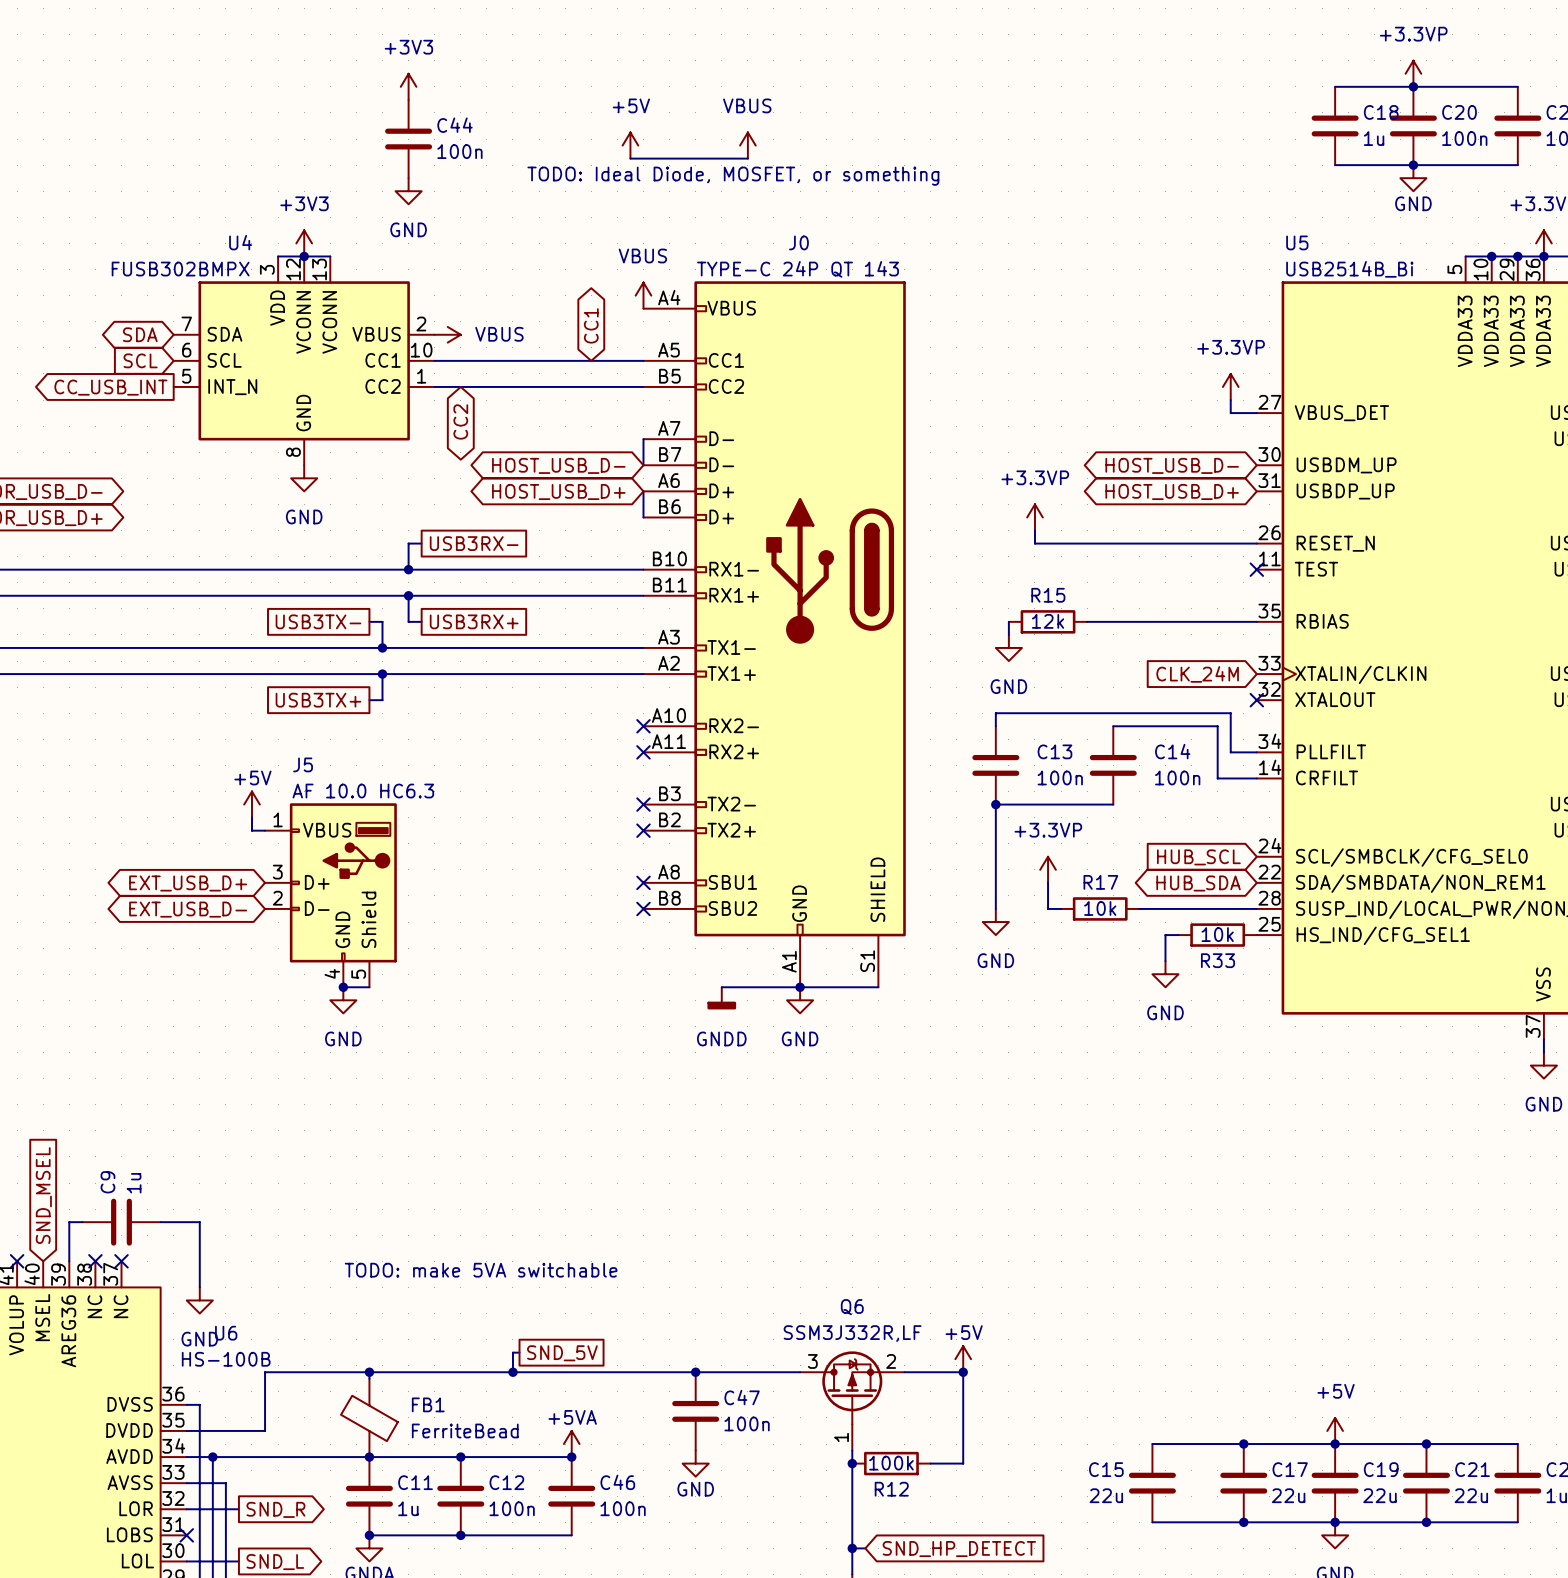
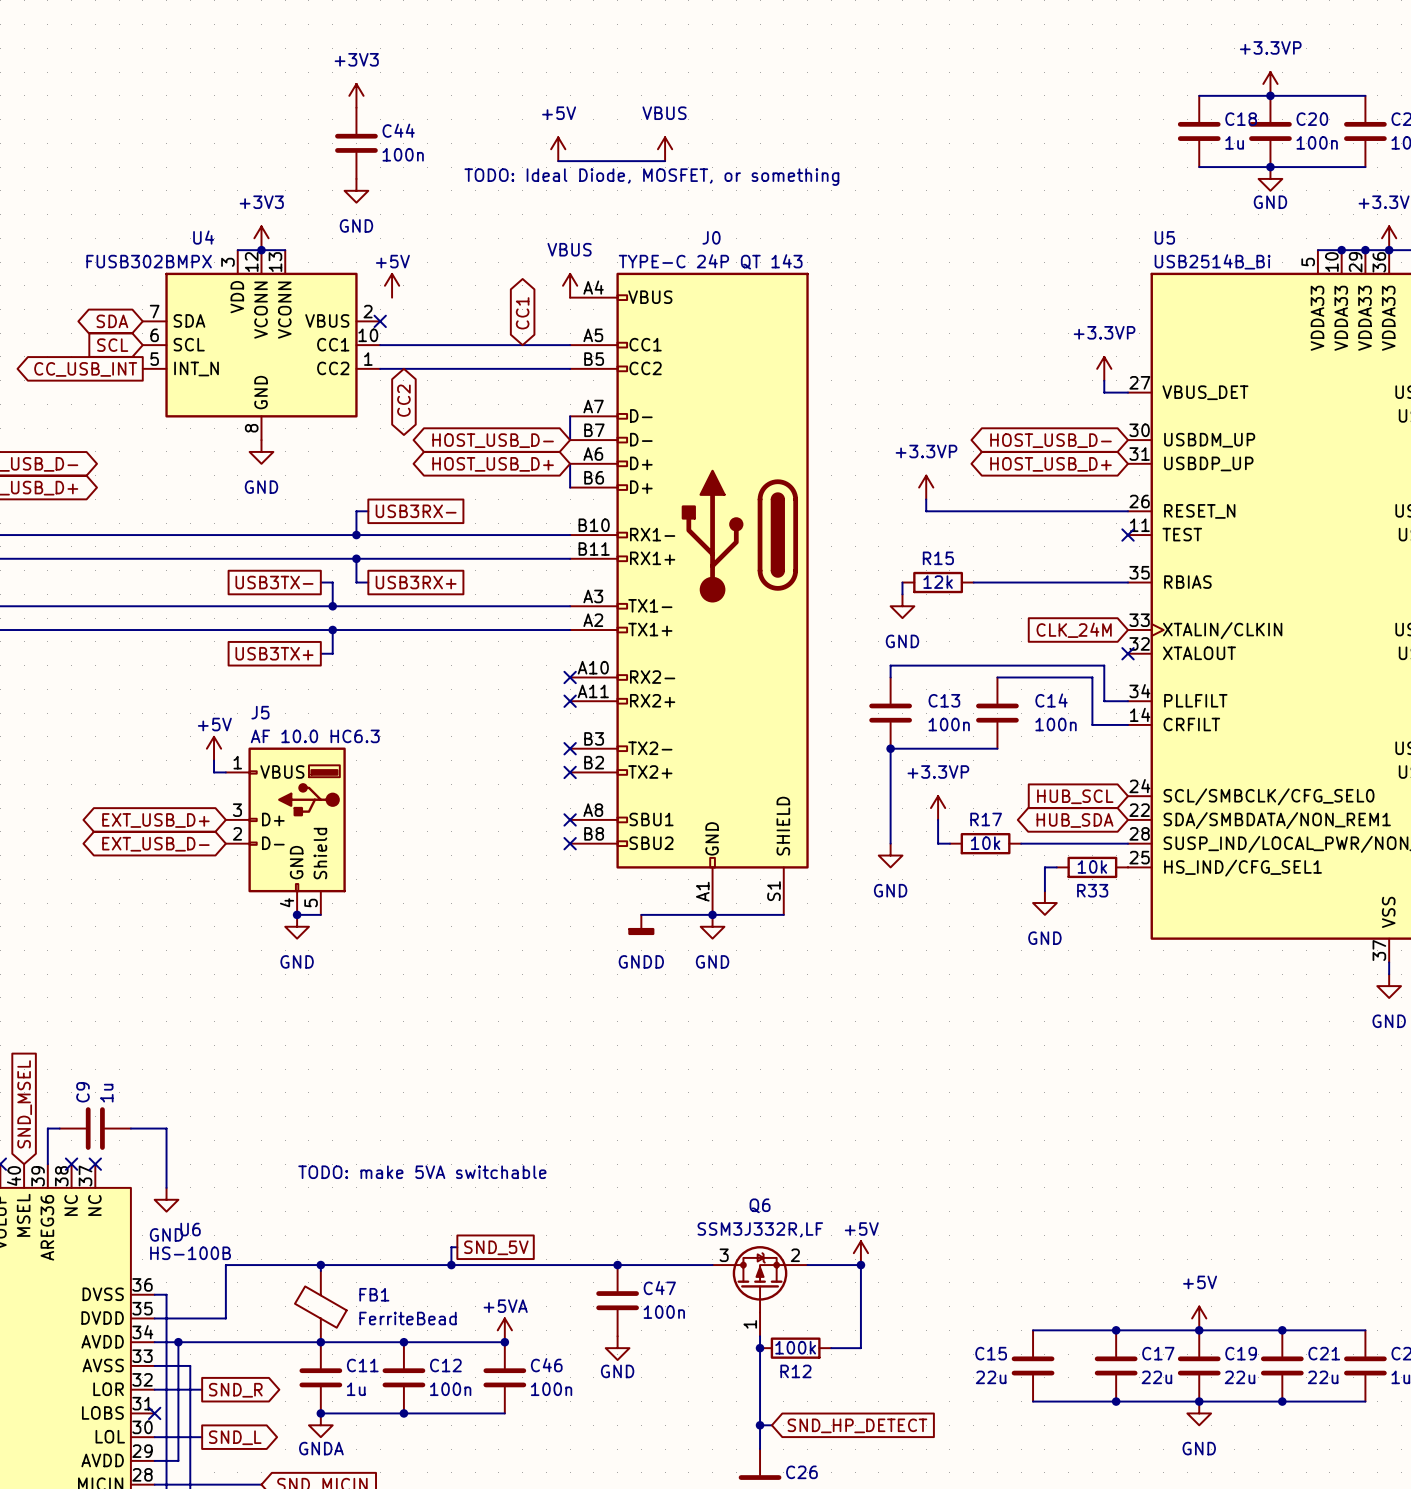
power symbol: none -> +5V (392, 285)
no-connect mark: none -> (380, 321)
power symbol: VBUS (447, 334) -> none

